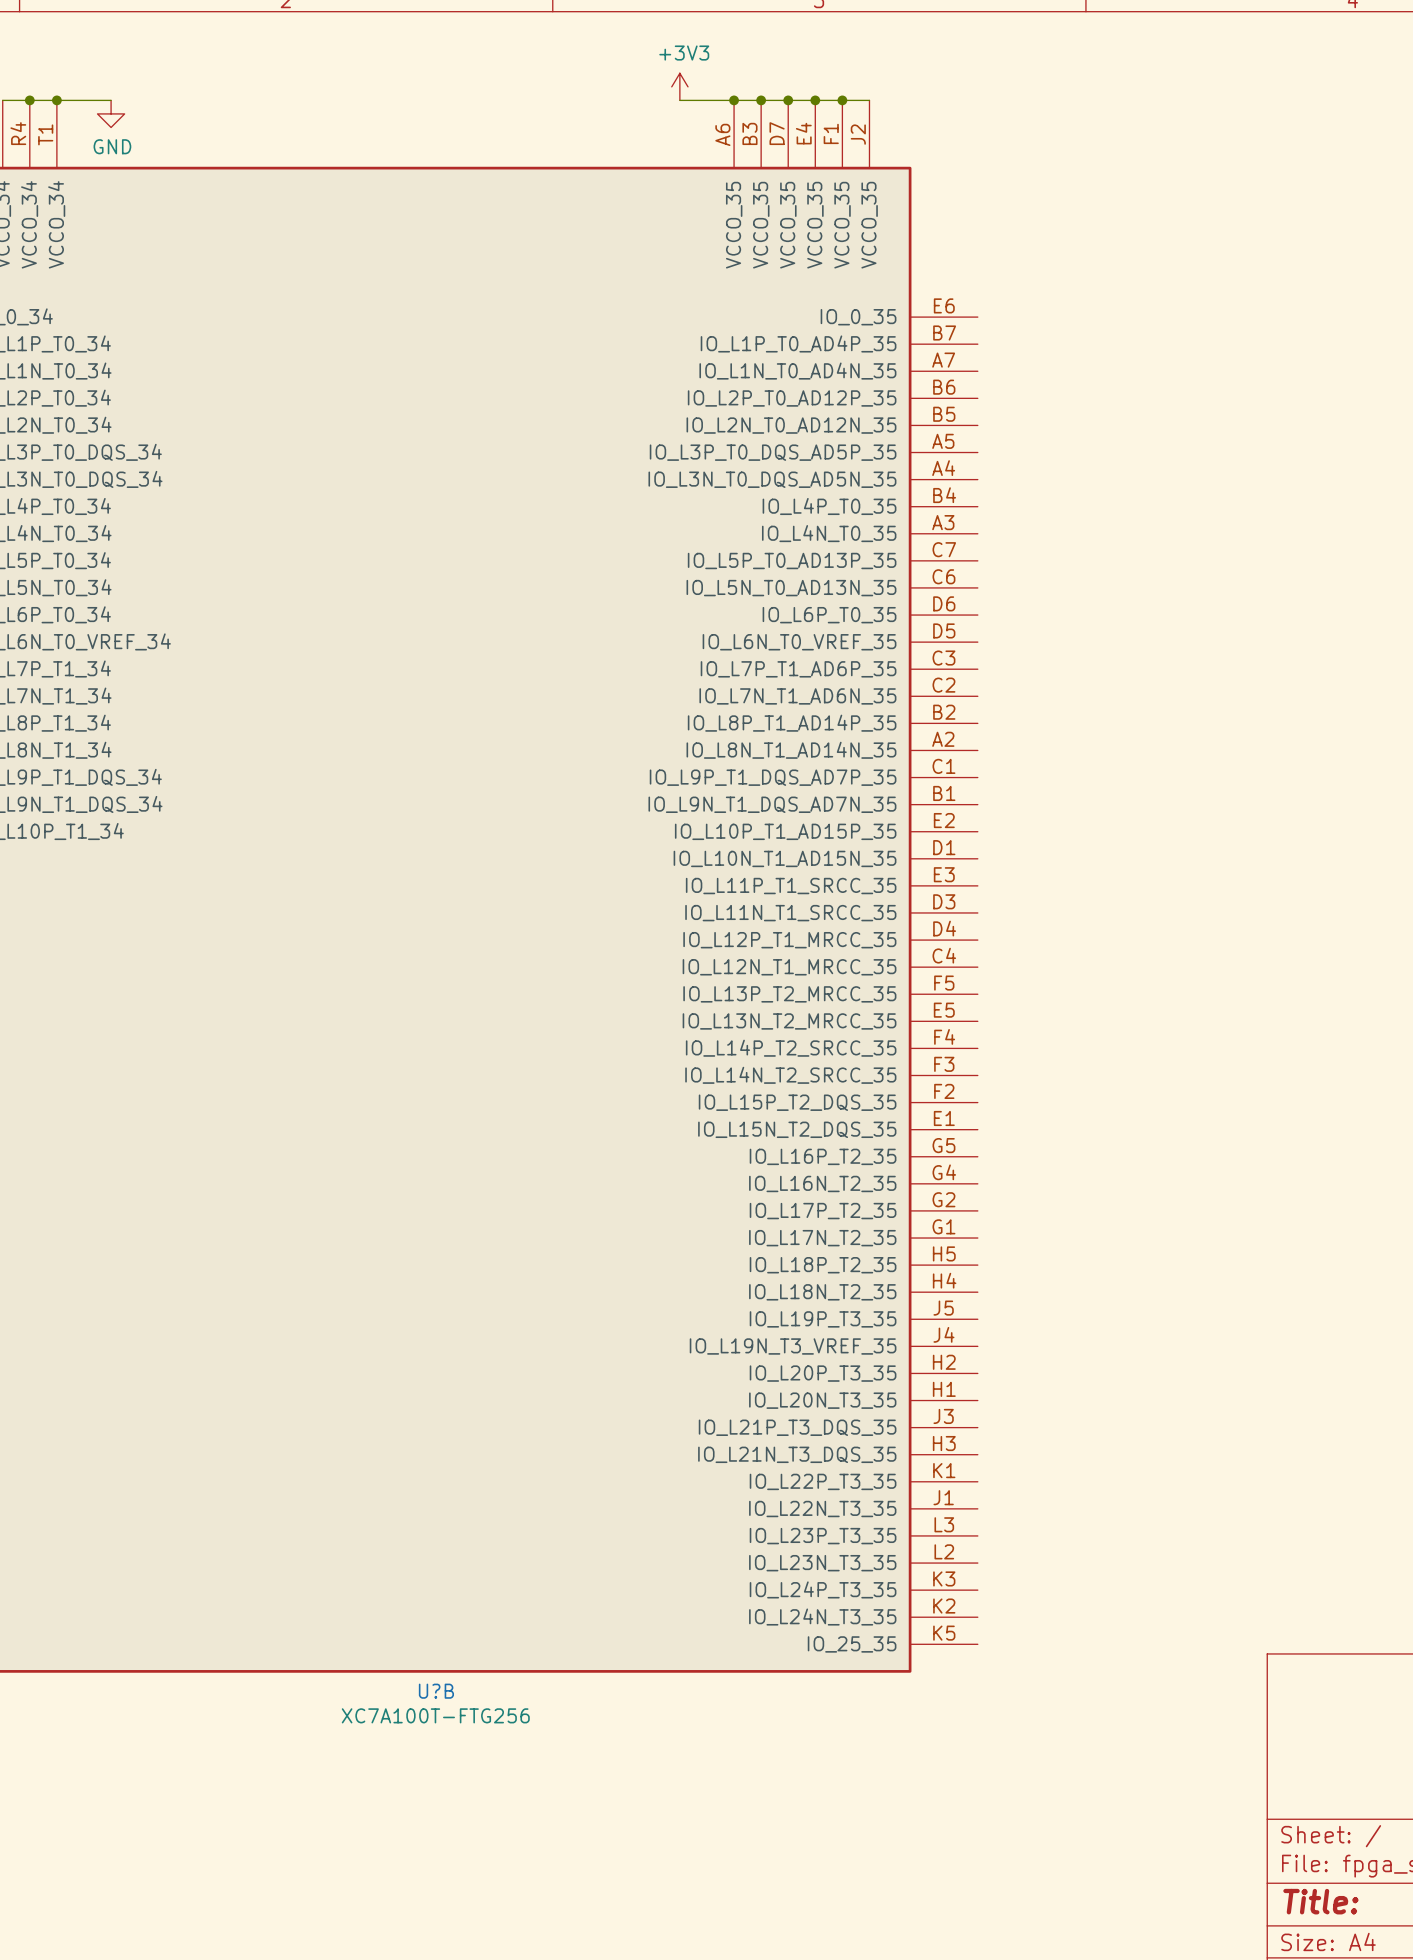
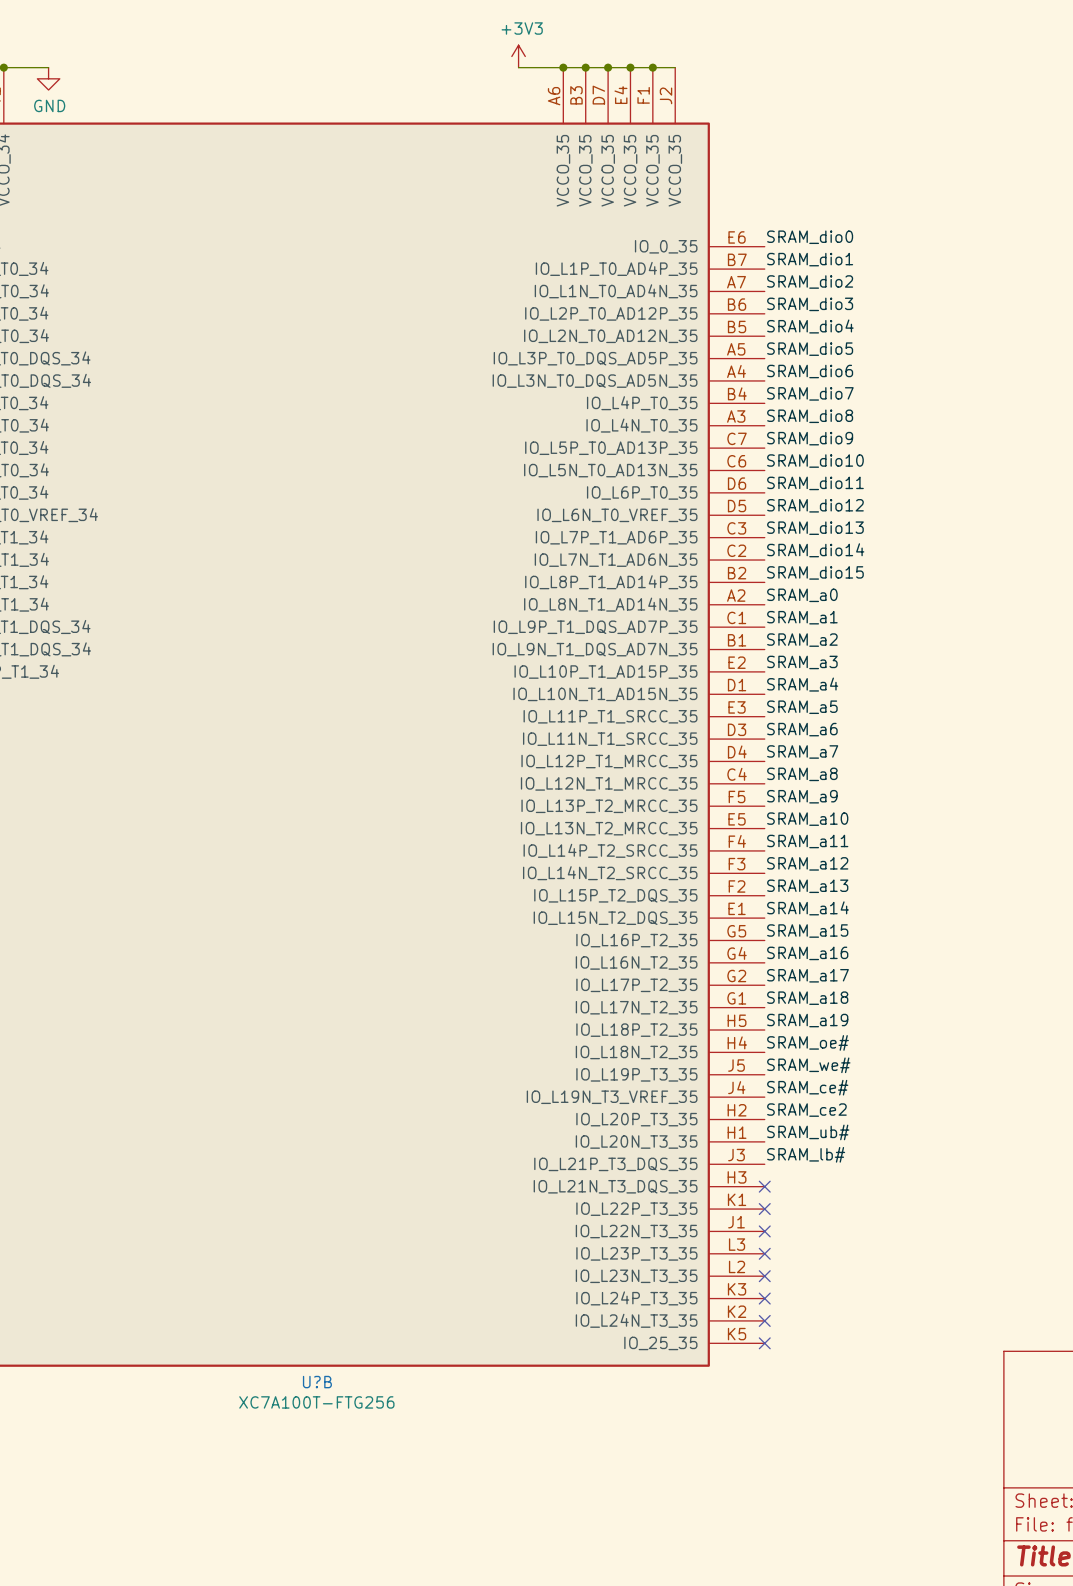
label: none -> SRAM_dio0 (810, 237)
label: none -> SRAM_dio1 (810, 259)
label: none -> SRAM_dio2 (810, 281)
label: none -> SRAM_dio3 (810, 304)
label: none -> SRAM_dio4 (810, 326)
label: none -> SRAM_dio5 (810, 349)
label: none -> SRAM_dio6 (810, 371)
label: none -> SRAM_dio7 (810, 393)
label: none -> SRAM_dio8 (810, 416)
label: none -> SRAM_dio9 (810, 438)
label: none -> SRAM_dio10 (815, 461)
label: none -> SRAM_dio11 (815, 483)
label: none -> SRAM_dio12 (815, 505)
label: none -> SRAM_dio13 (815, 528)
label: none -> SRAM_dio14 (815, 550)
label: none -> SRAM_dio15 (815, 572)
label: none -> SRAM_a0 (802, 595)
label: none -> SRAM_a1 (802, 617)
label: none -> SRAM_a2 (802, 640)
label: none -> SRAM_a3 (802, 662)
label: none -> SRAM_a4 (802, 684)
label: none -> SRAM_a5 (802, 707)
label: none -> SRAM_a6 (802, 729)
label: none -> SRAM_a7 (802, 751)
label: none -> SRAM_a8 (802, 774)
label: none -> SRAM_a9 (802, 796)
label: none -> SRAM_a10 (807, 819)
label: none -> SRAM_a11 (807, 841)
label: none -> SRAM_a12 (807, 863)
label: none -> SRAM_a13 (807, 886)
label: none -> SRAM_a14 (807, 908)
label: none -> SRAM_a15 (807, 931)
label: none -> SRAM_a16 (807, 953)
label: none -> SRAM_a17 (807, 975)
label: none -> SRAM_a18 (807, 998)
label: none -> SRAM_a19 (807, 1020)
label: none -> SRAM_oe# (807, 1042)
label: none -> SRAM_we# (808, 1065)
label: none -> SRAM_ce# (807, 1087)
label: none -> SRAM_ce2 (806, 1110)
label: none -> SRAM_ub# (808, 1132)
label: none -> SRAM_lb# (806, 1154)
no-connect mark: none -> (764, 1186)
no-connect mark: none -> (764, 1209)
no-connect mark: none -> (764, 1231)
no-connect mark: none -> (764, 1253)
no-connect mark: none -> (764, 1276)
no-connect mark: none -> (764, 1298)
no-connect mark: none -> (764, 1320)
no-connect mark: none -> (764, 1343)

